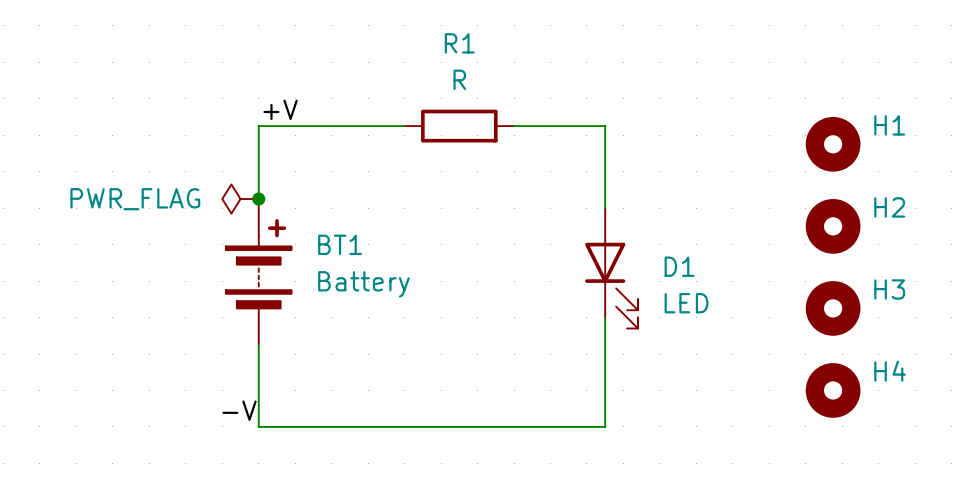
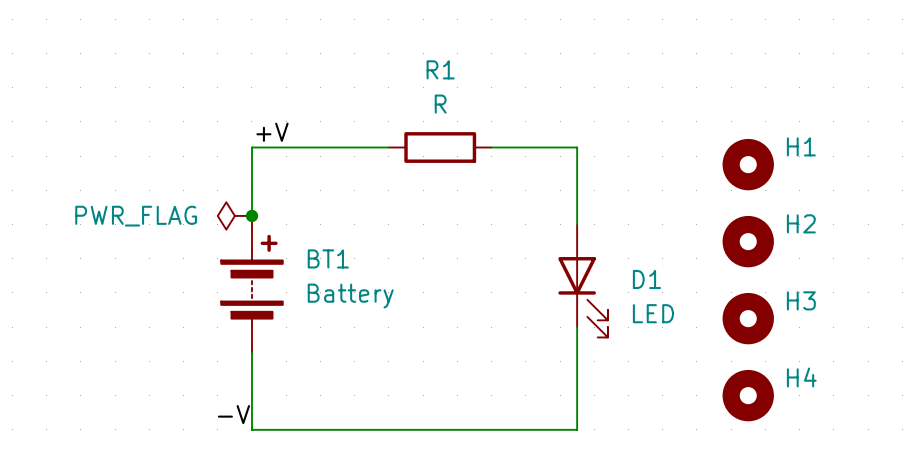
H1 position: (833, 144) -> (748, 164)
H2 position: (833, 226) -> (748, 241)
H3 position: (833, 308) -> (748, 318)
H4 position: (833, 390) -> (748, 395)

